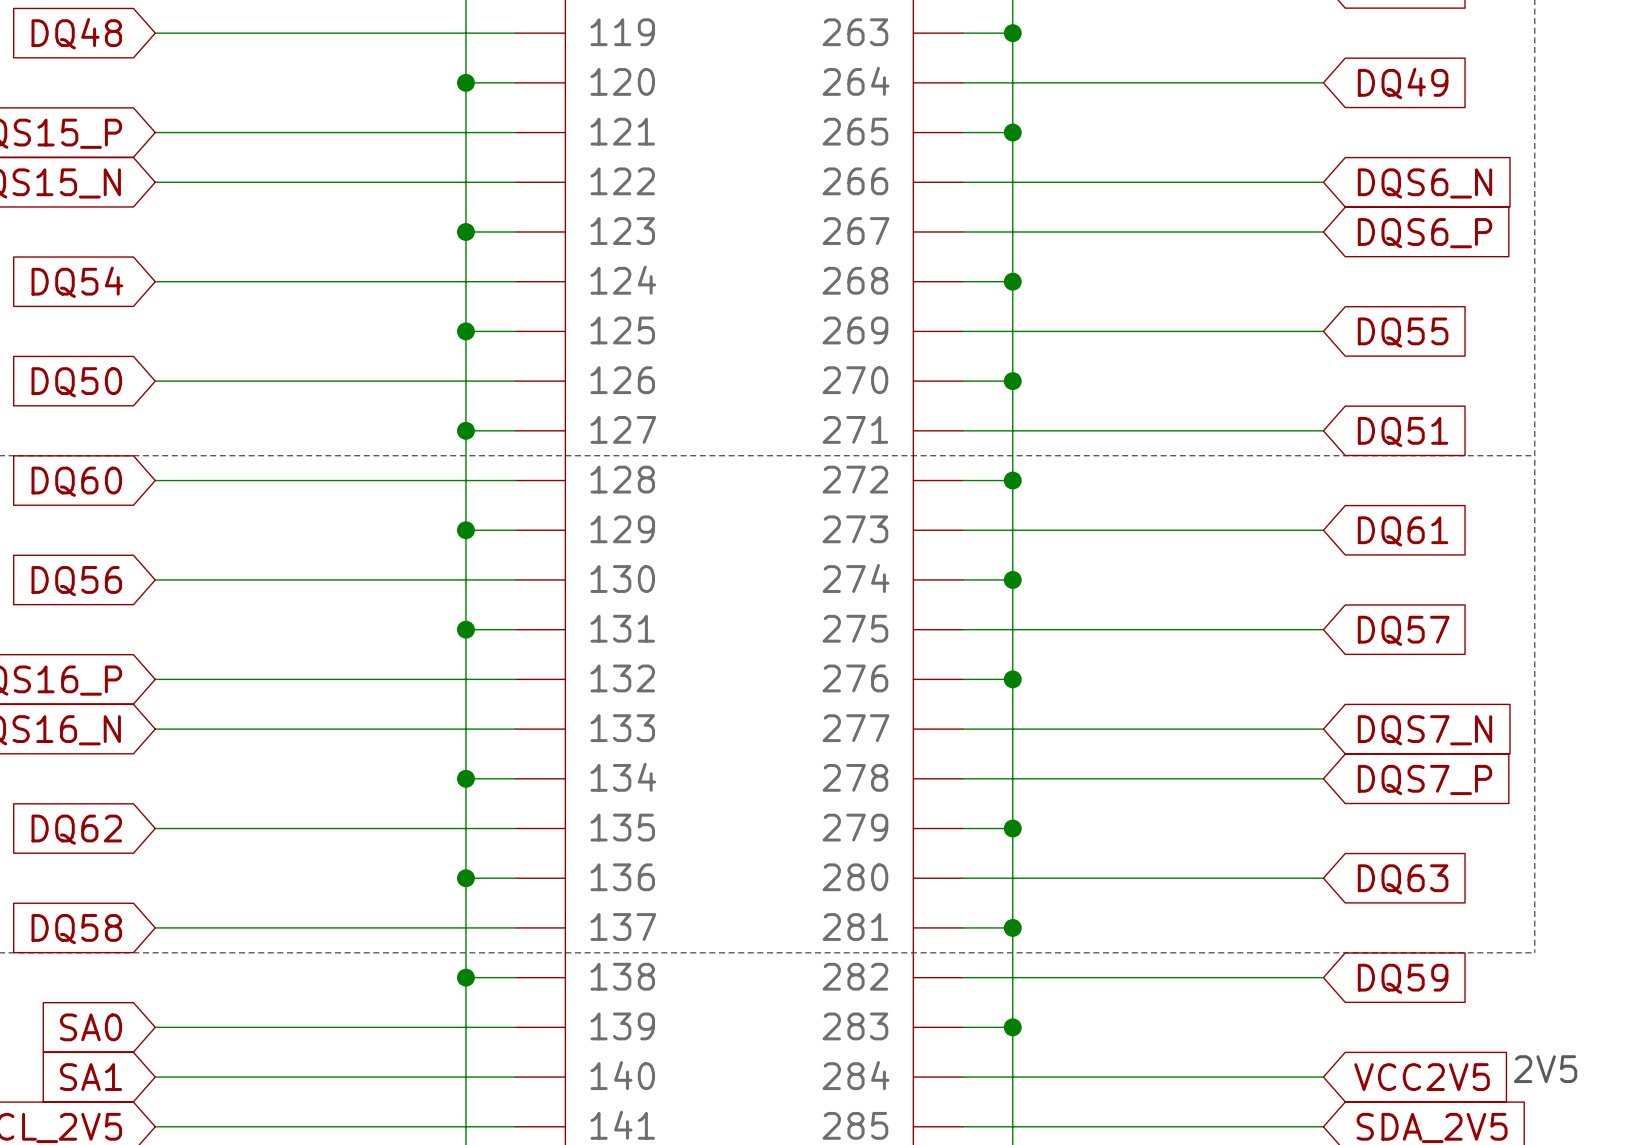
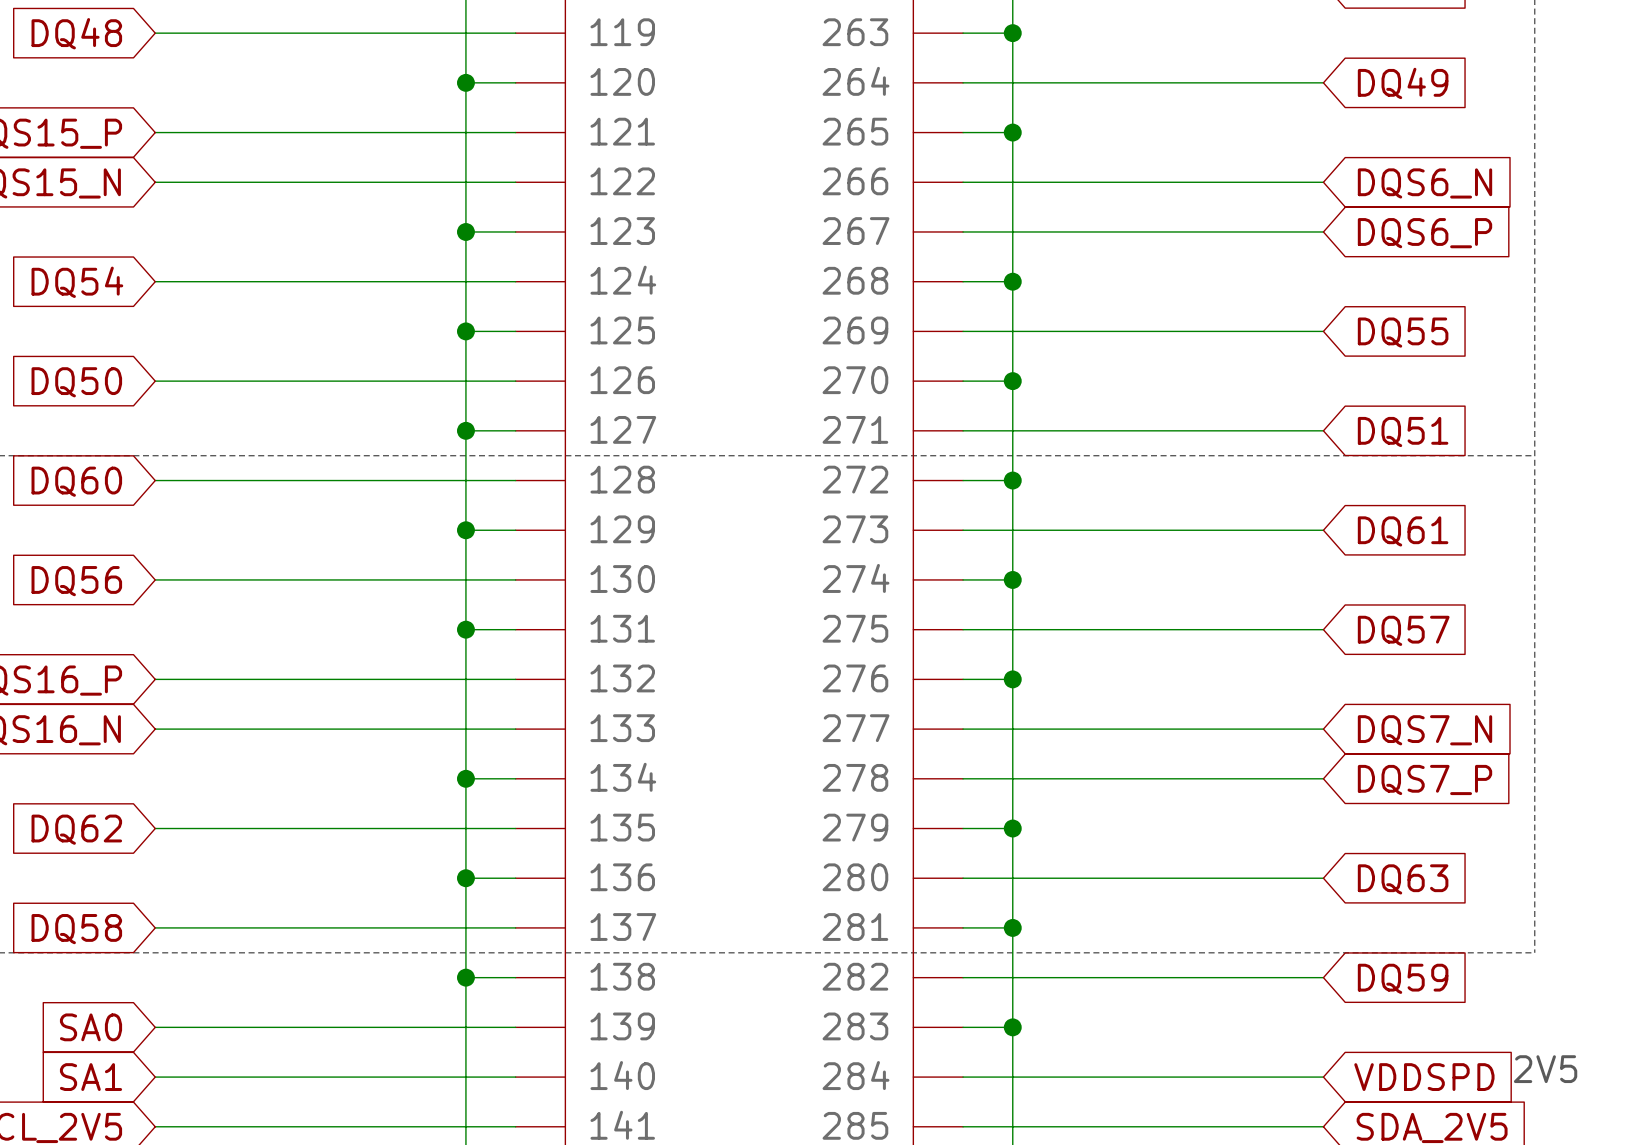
global label: VCC2V5 (1422, 1077) -> VDDSPD (1424, 1077)

